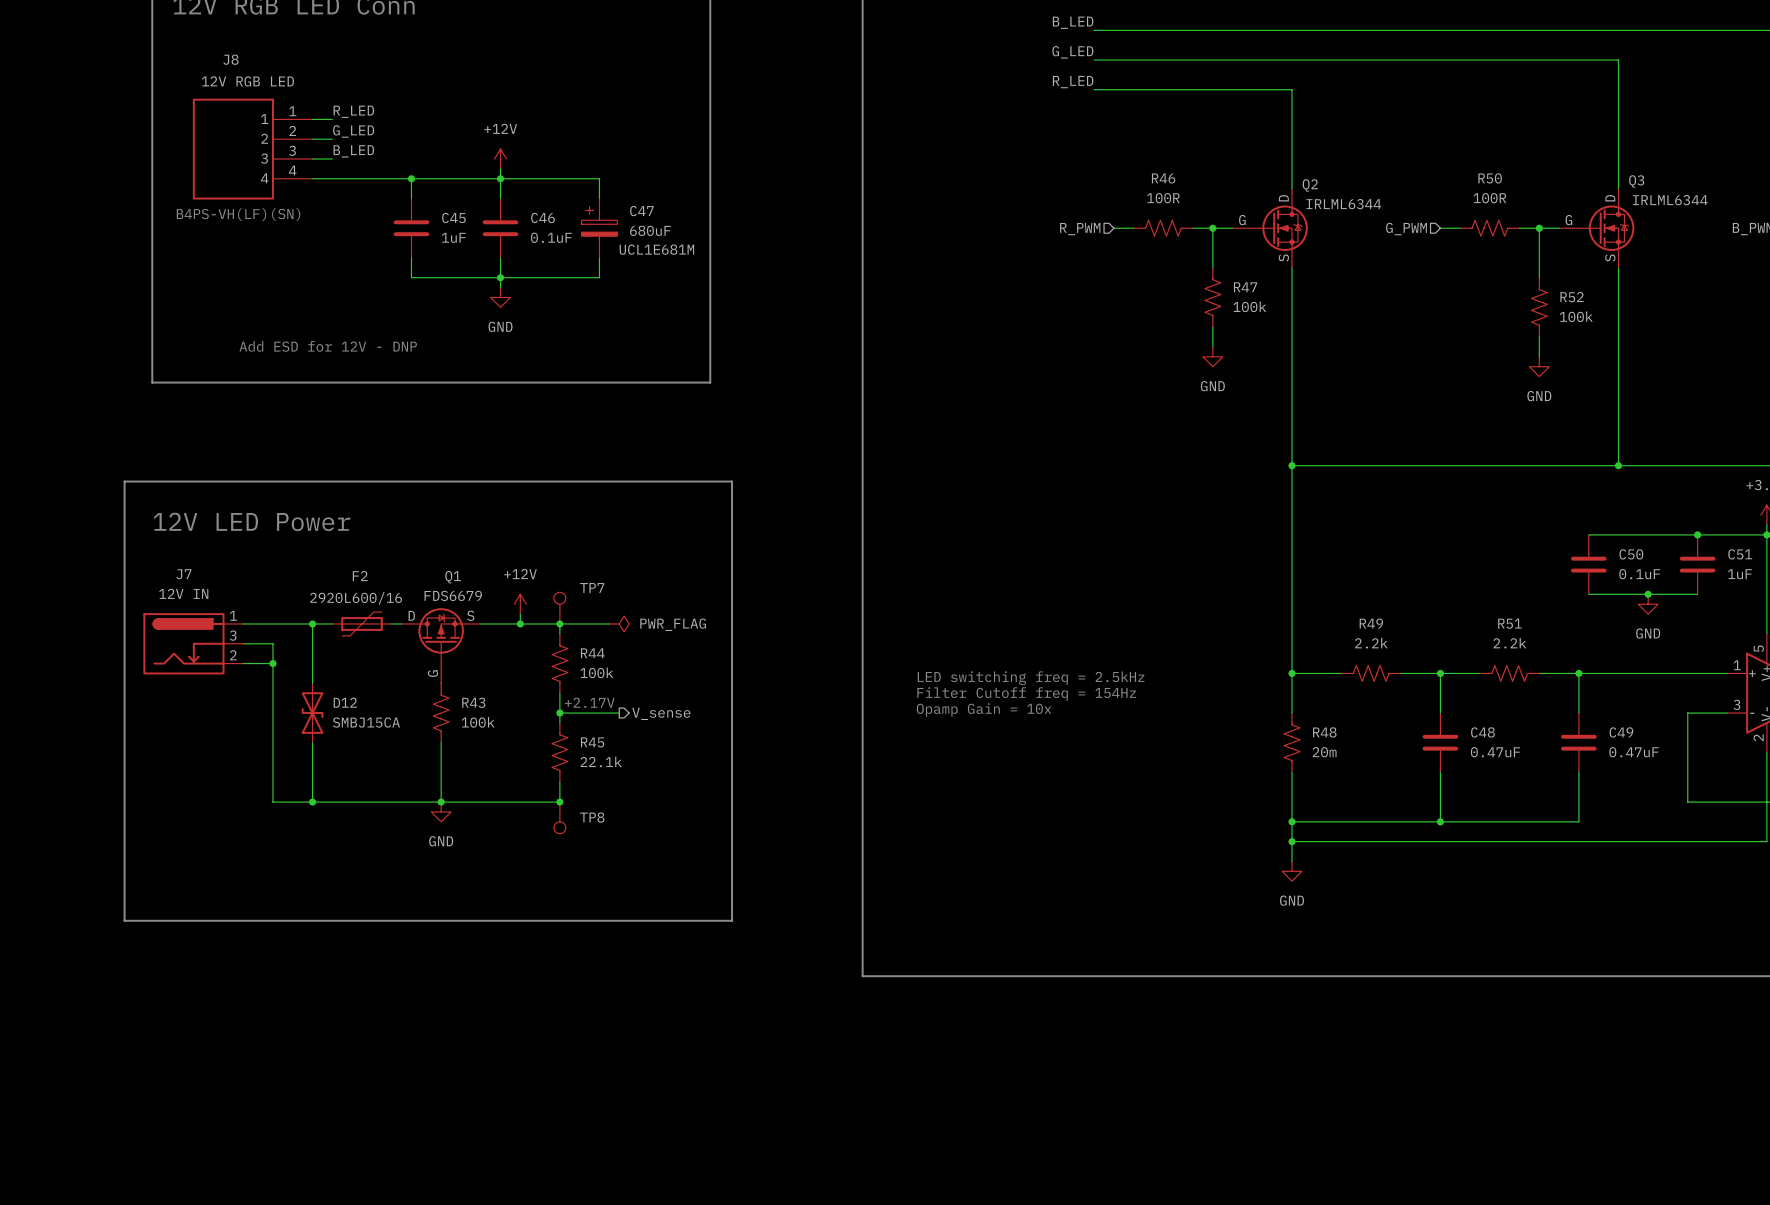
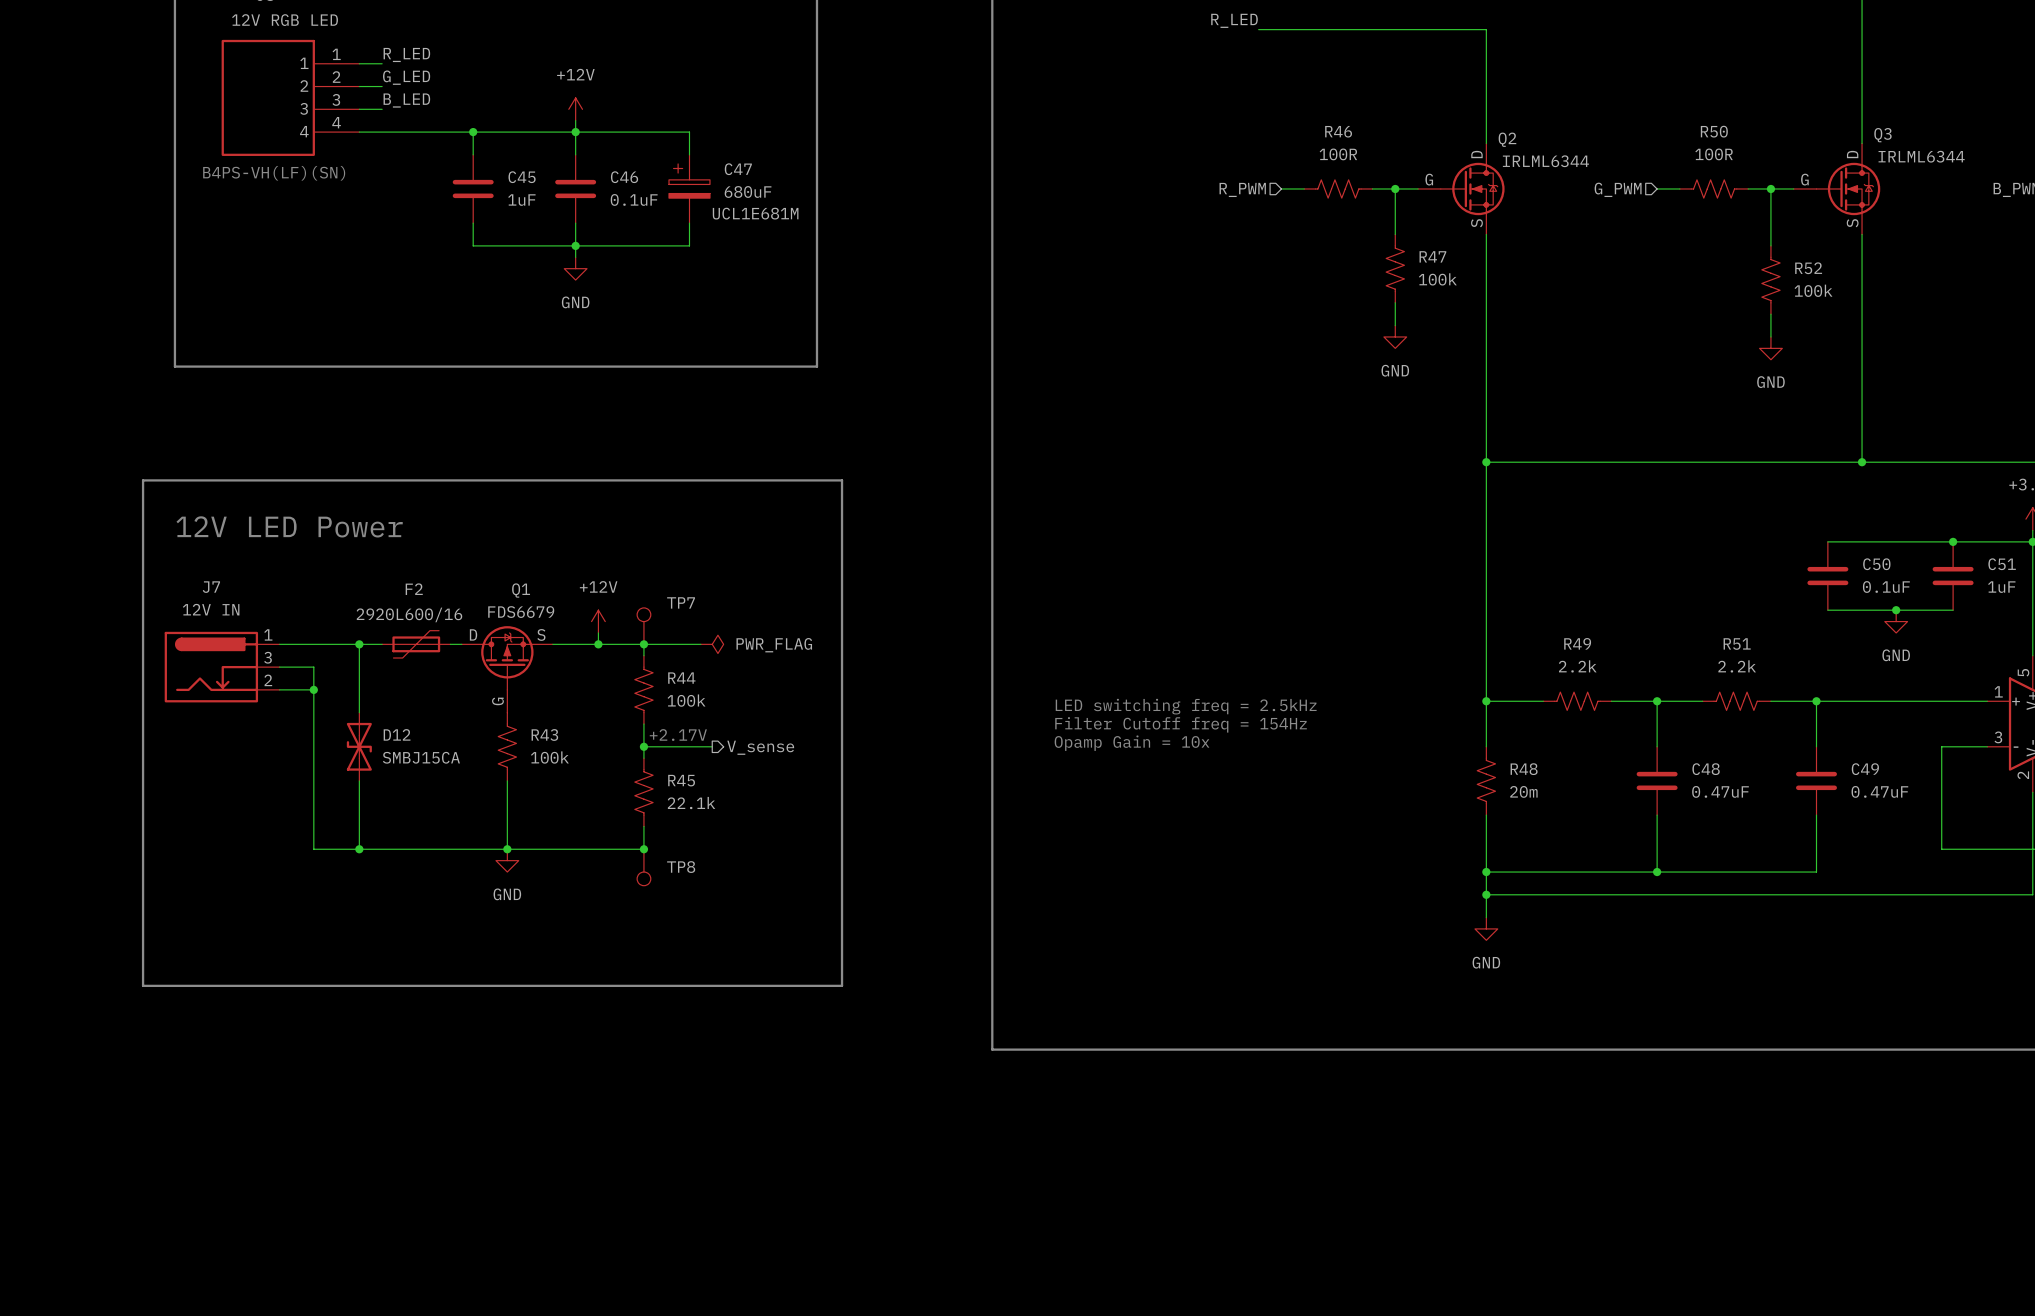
text: Add ESD for 12V - DNP (328, 346) -> none

